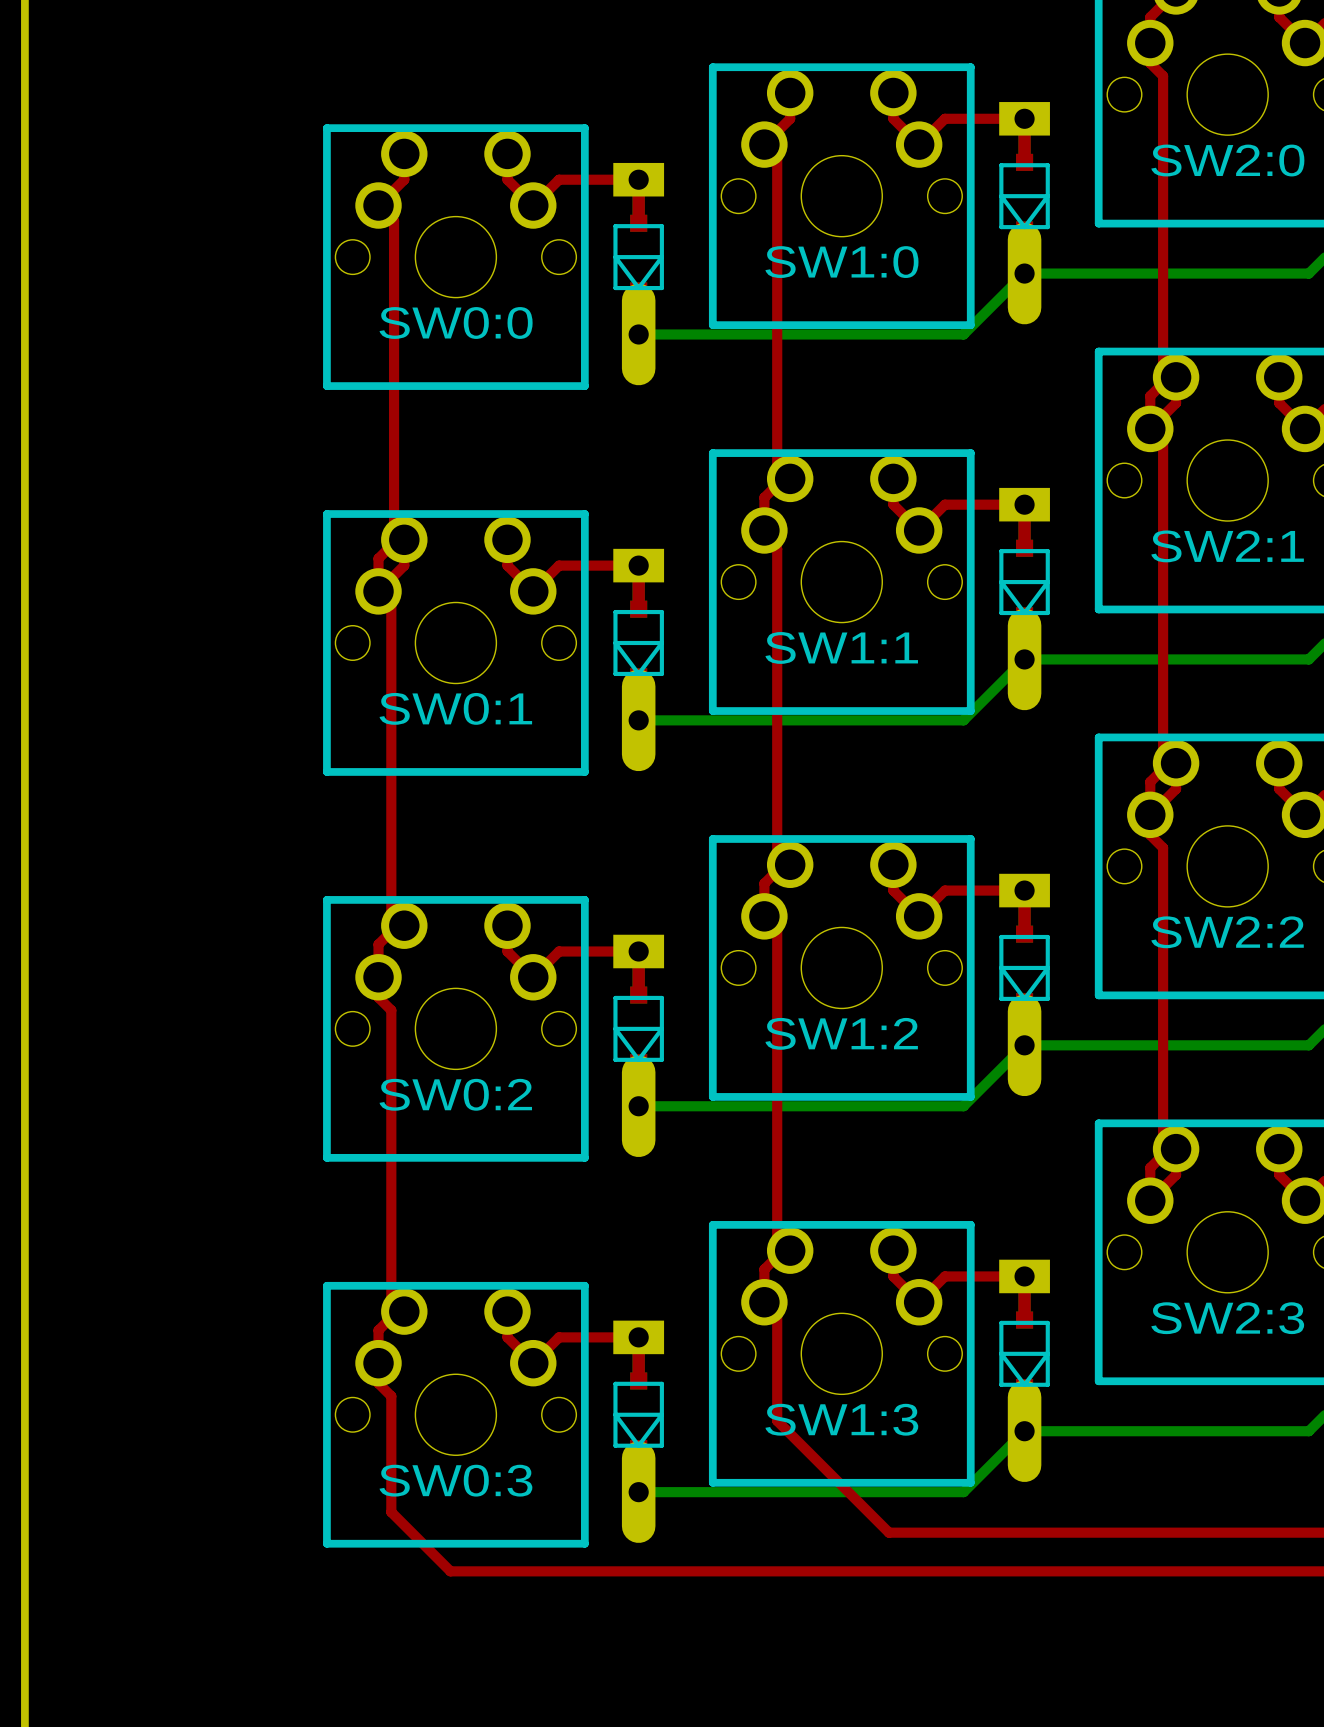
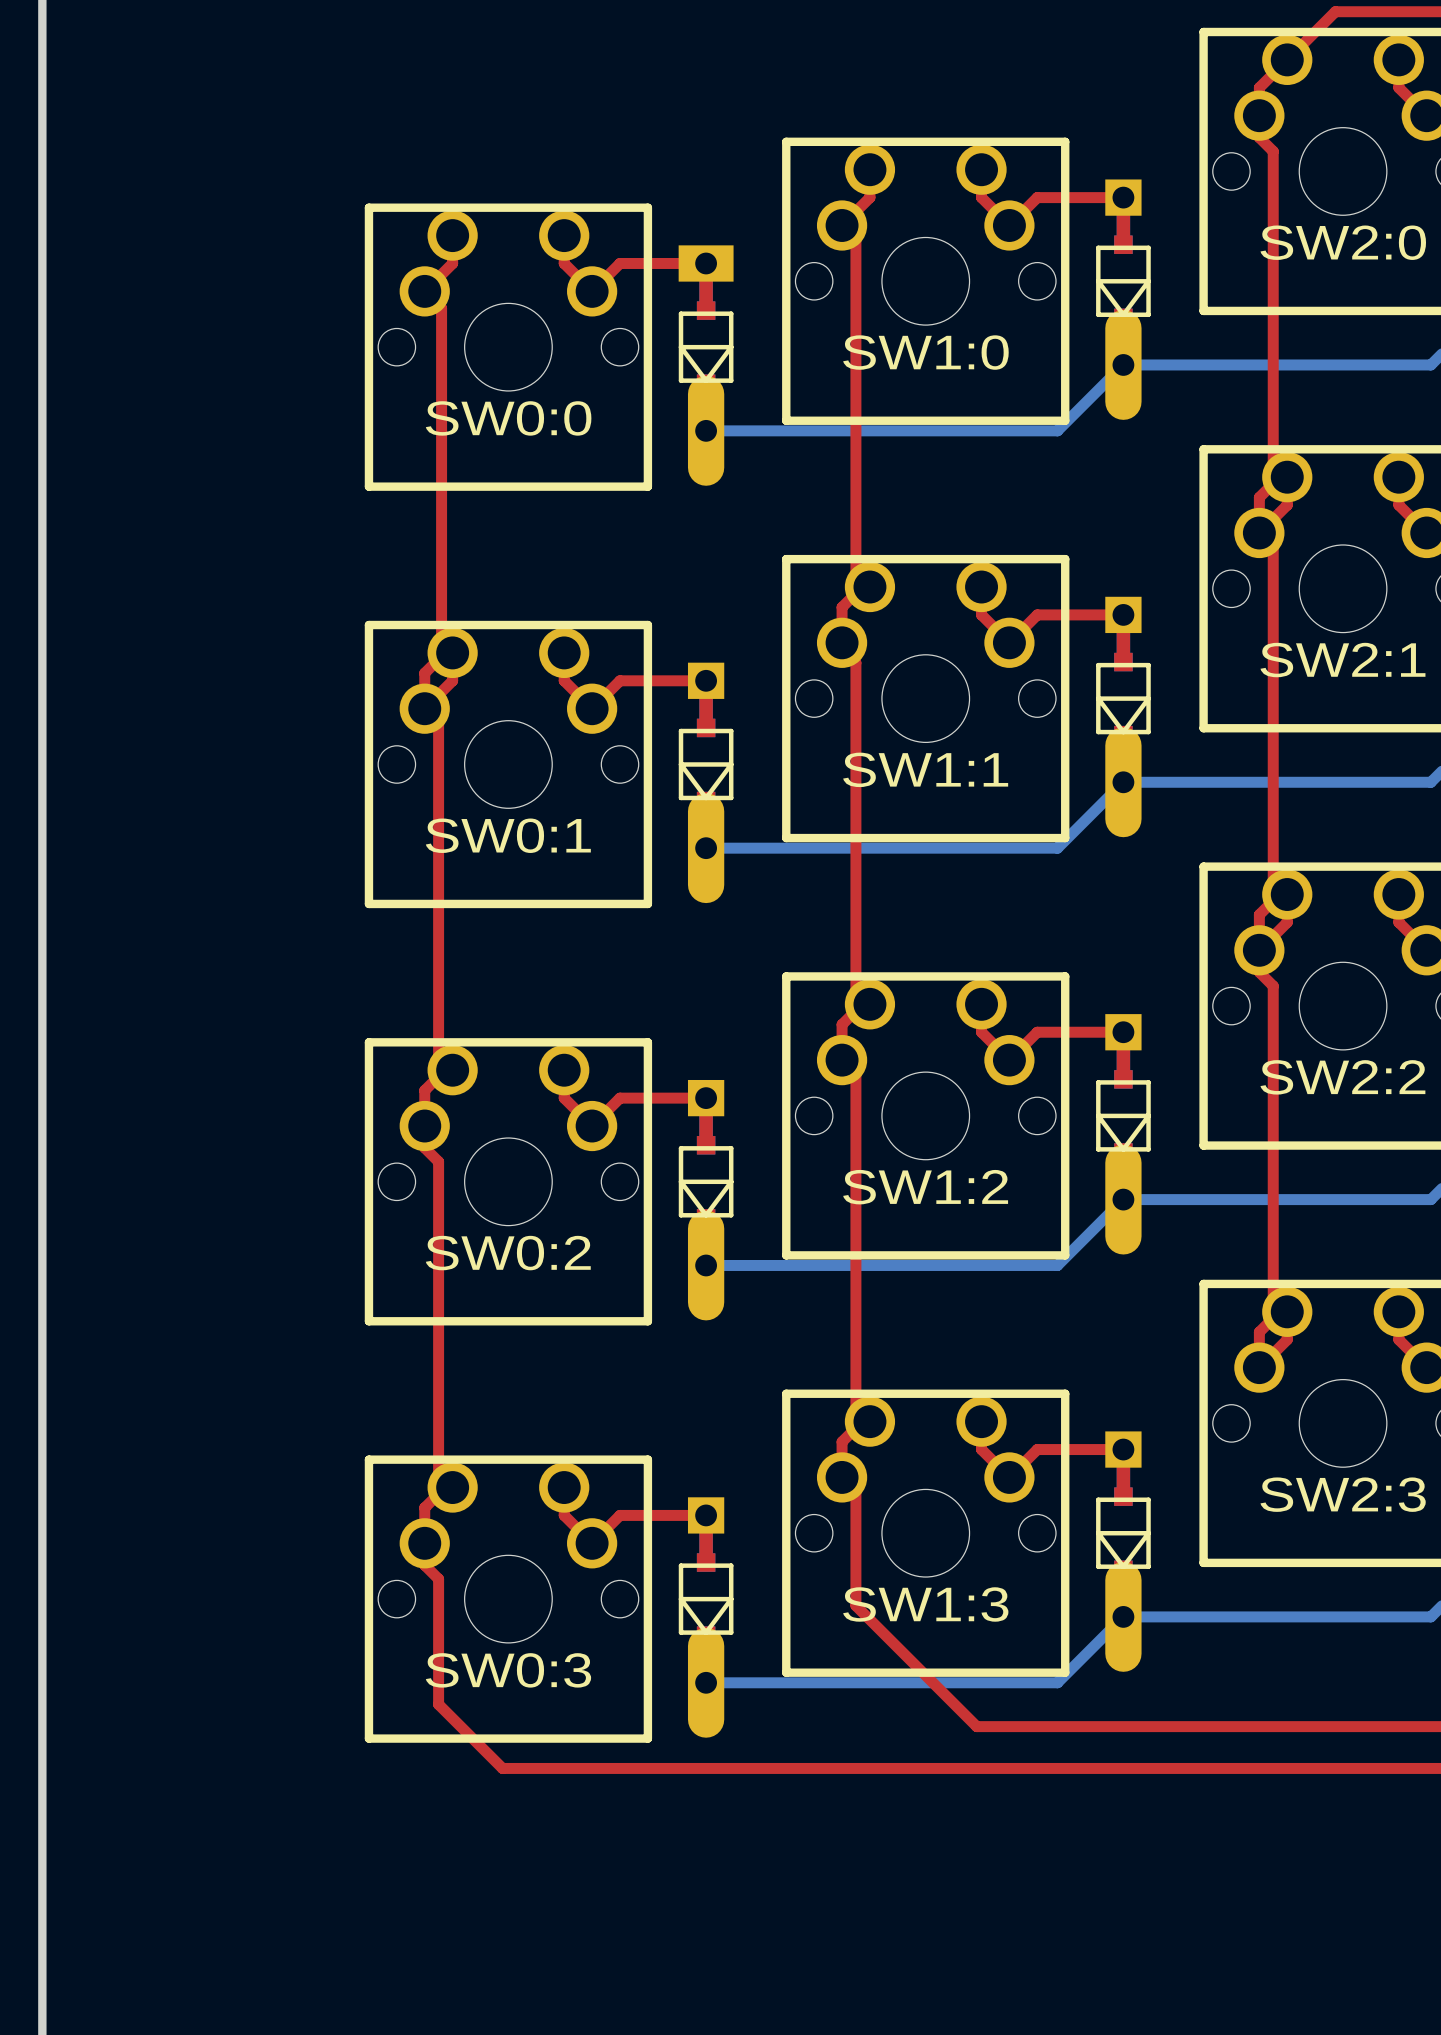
part footprint: [999, 102, 1050, 325] -> [1096, 179, 1151, 420]
part footprint: [999, 487, 1050, 711] -> [1096, 596, 1151, 838]
part footprint: [613, 548, 665, 772] -> [678, 662, 734, 904]
part footprint: [999, 873, 1050, 1097] -> [1096, 1014, 1151, 1255]
part footprint: [613, 934, 665, 1158] -> [678, 1079, 734, 1321]
part footprint: [999, 1259, 1050, 1482] -> [1096, 1431, 1151, 1672]
part footprint: [613, 1320, 665, 1543] -> [678, 1497, 734, 1738]

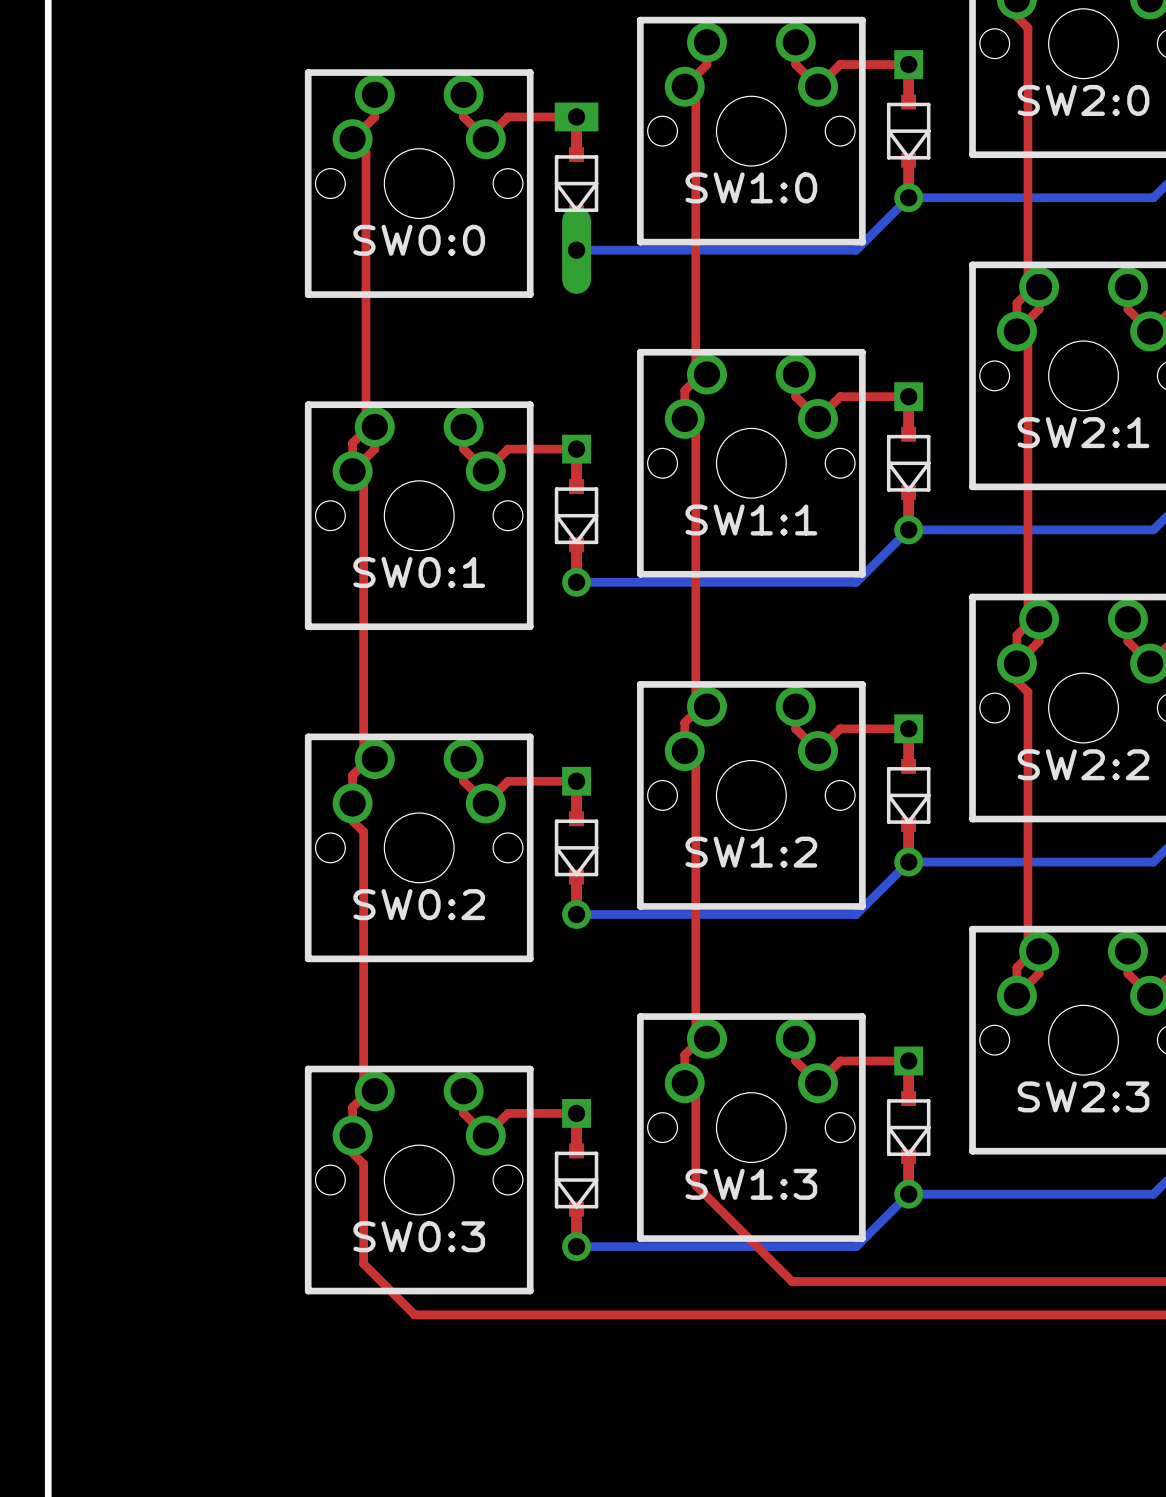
part footprint: [1096, 179, 1151, 420] -> [886, 50, 931, 213]
part footprint: [1096, 596, 1151, 838] -> [886, 382, 931, 545]
part footprint: [678, 662, 734, 904] -> [554, 434, 599, 597]
part footprint: [1096, 1014, 1151, 1255] -> [886, 714, 931, 877]
part footprint: [678, 1079, 734, 1321] -> [554, 766, 599, 929]
part footprint: [1096, 1431, 1151, 1672] -> [886, 1046, 931, 1209]
part footprint: [678, 1497, 734, 1738] -> [554, 1098, 599, 1262]

